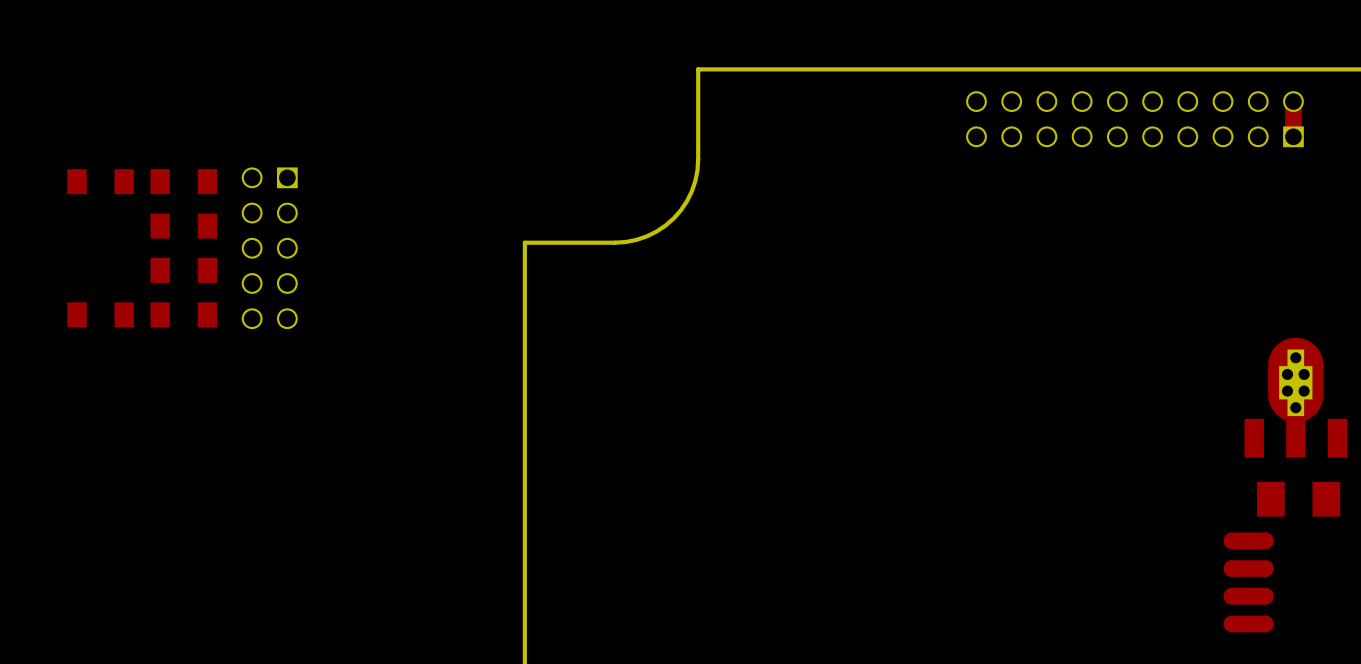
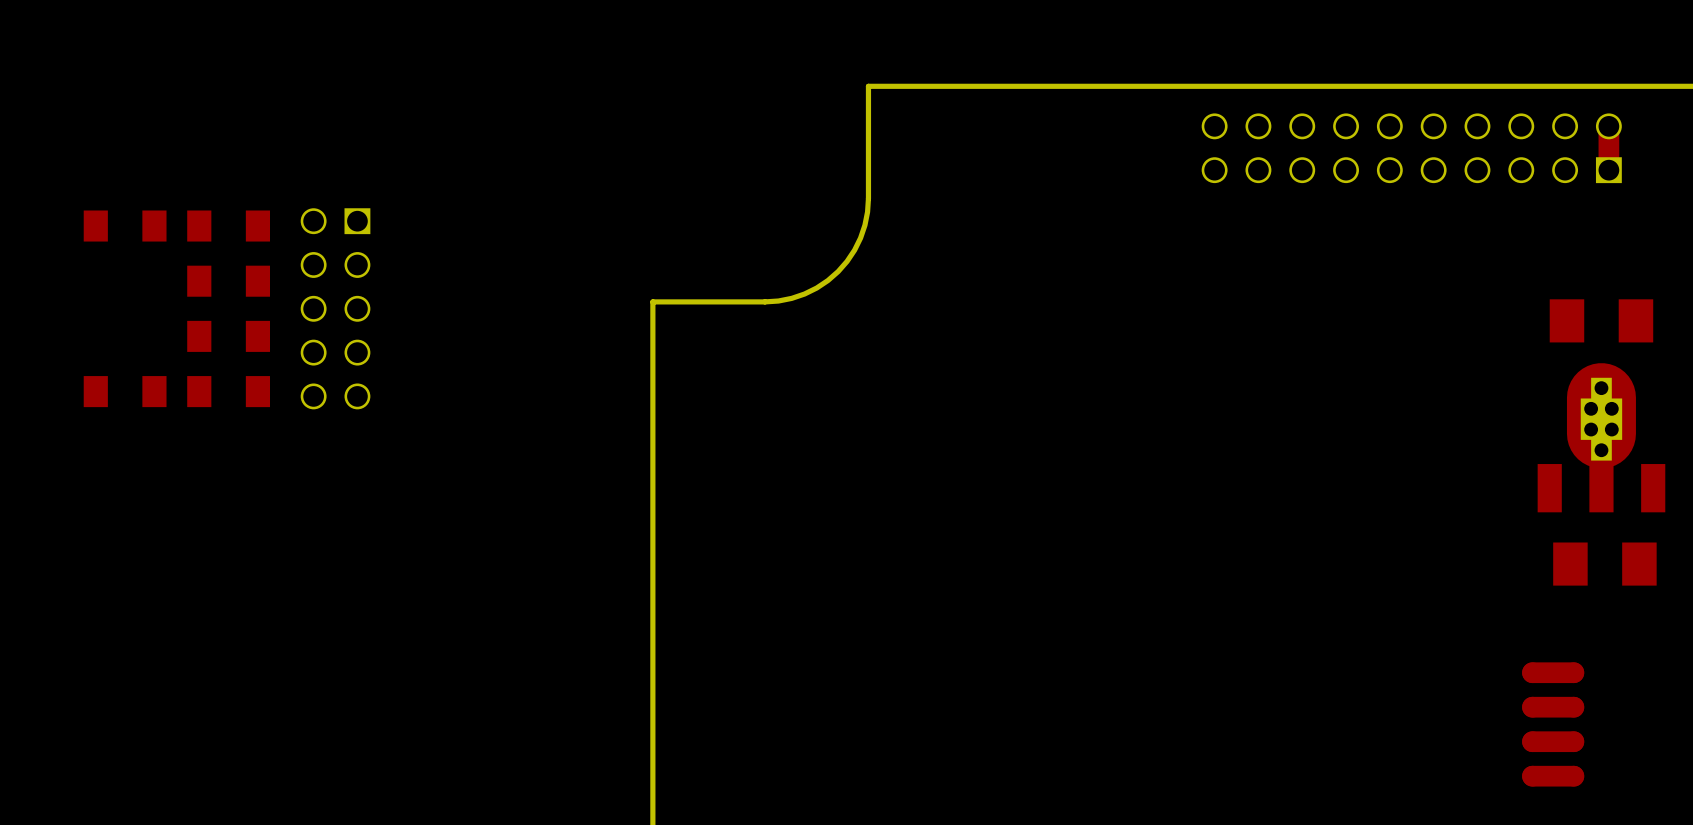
part: none -> (1601, 320)
part position: (1295, 397) -> (1601, 437)
part position: (1298, 499) -> (1604, 564)

